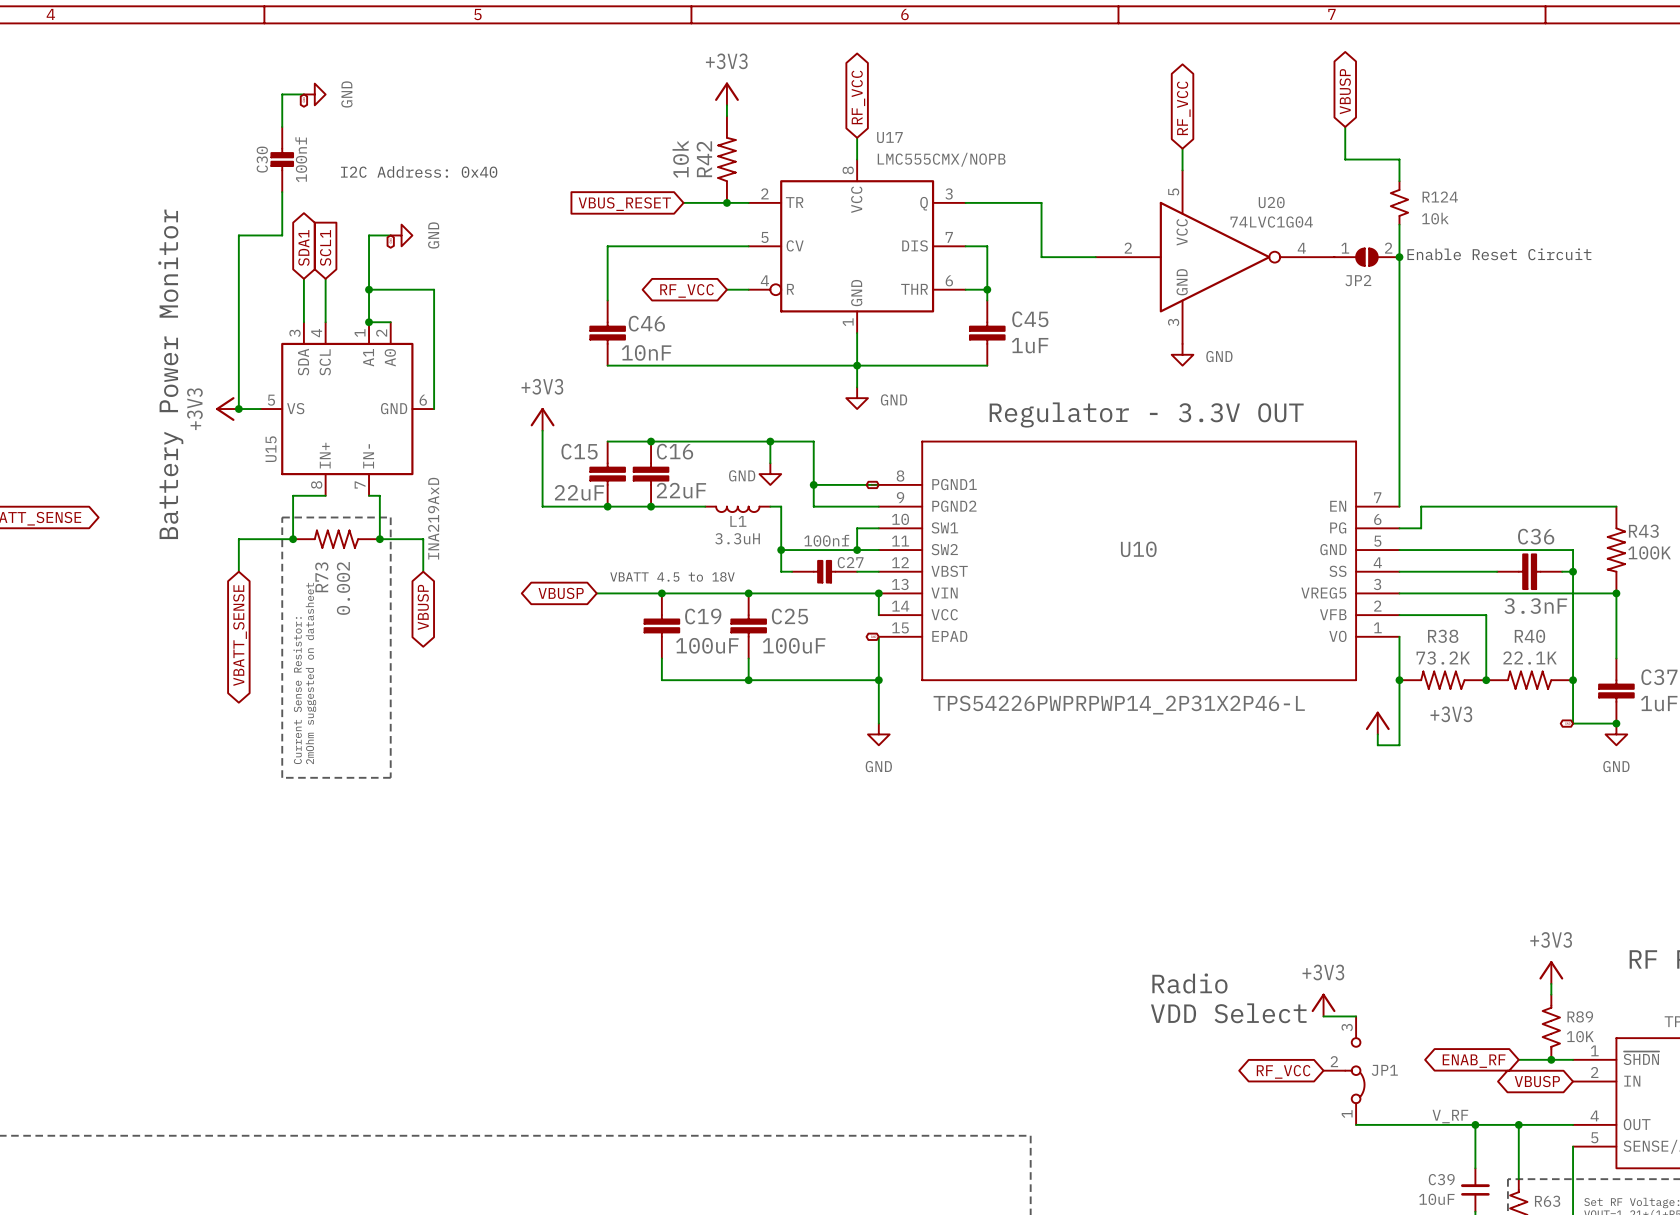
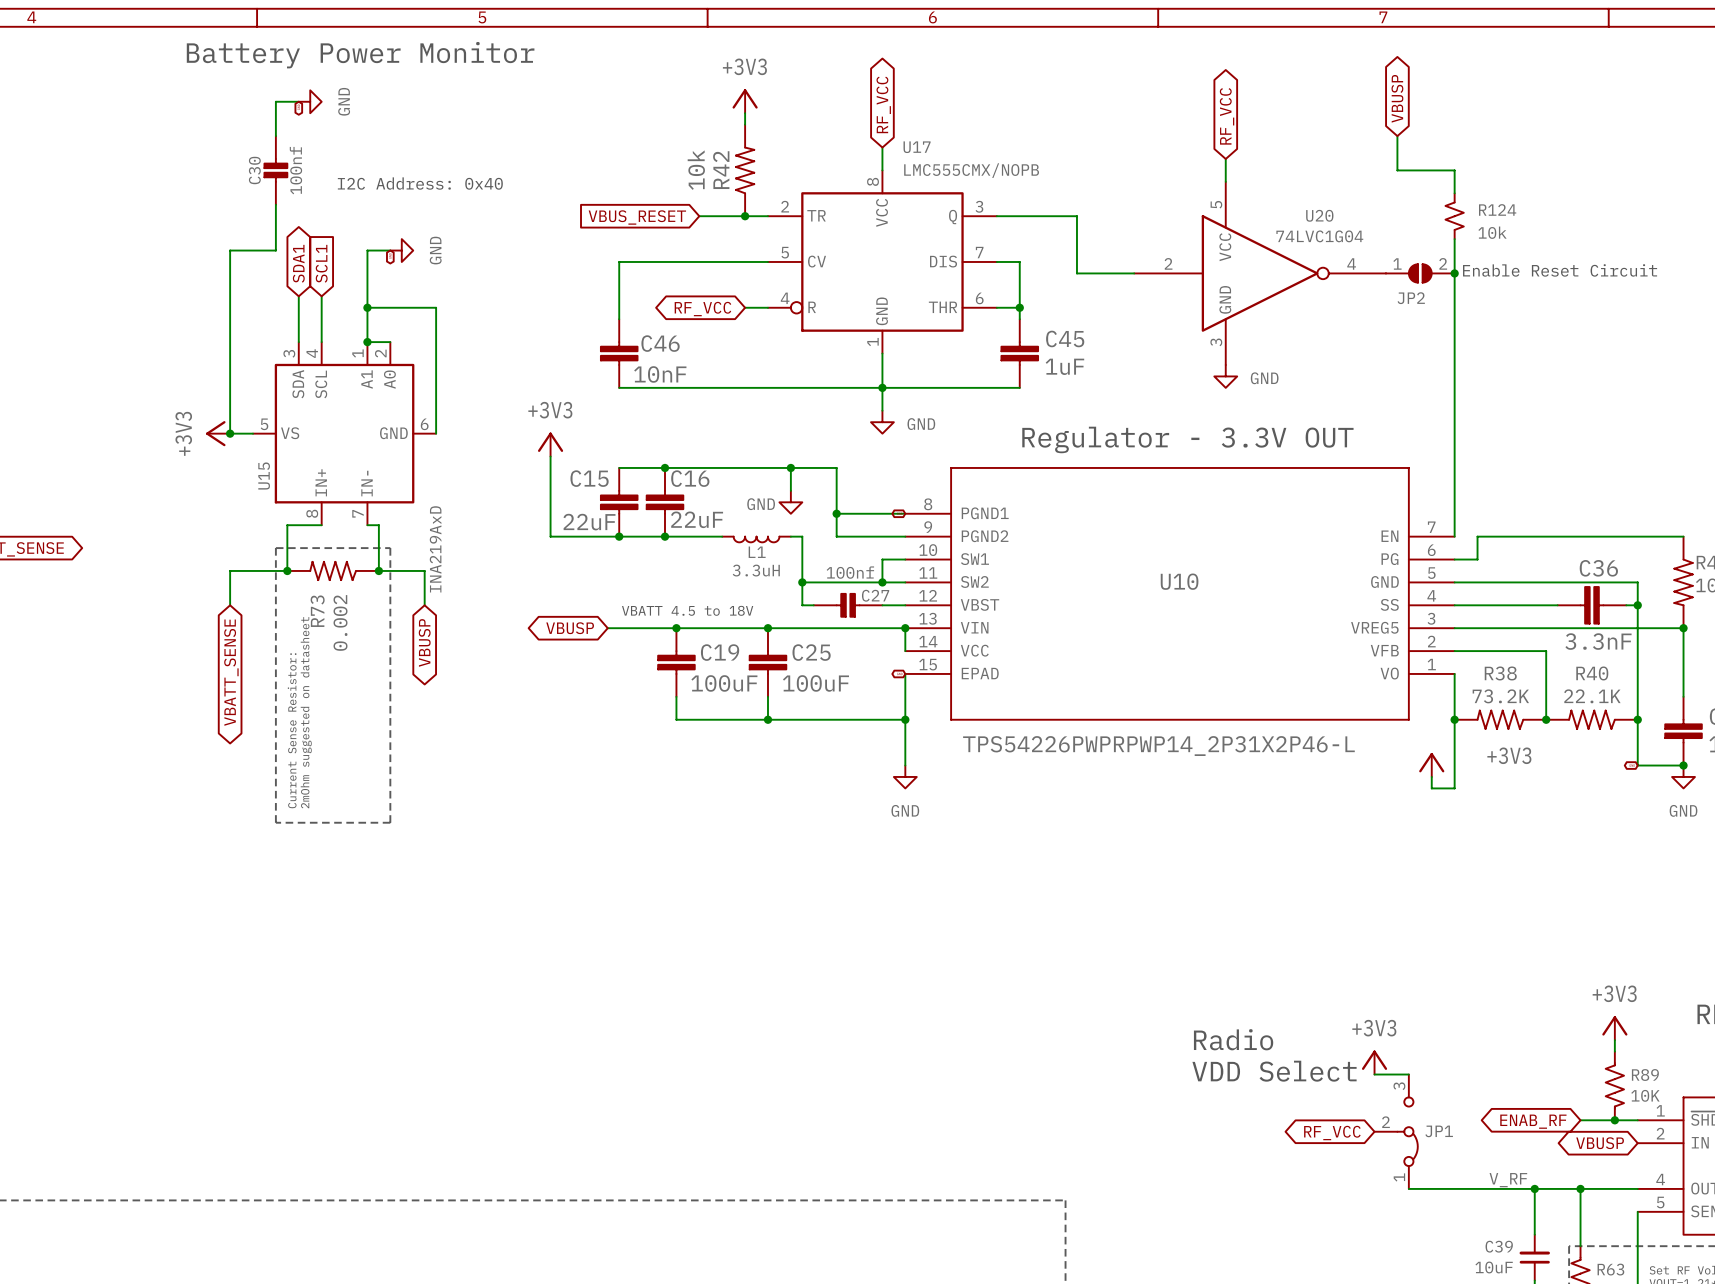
text: none -> Battery Power Monitor (360, 55)
text: Battery Power Monitor (170, 374) -> none

